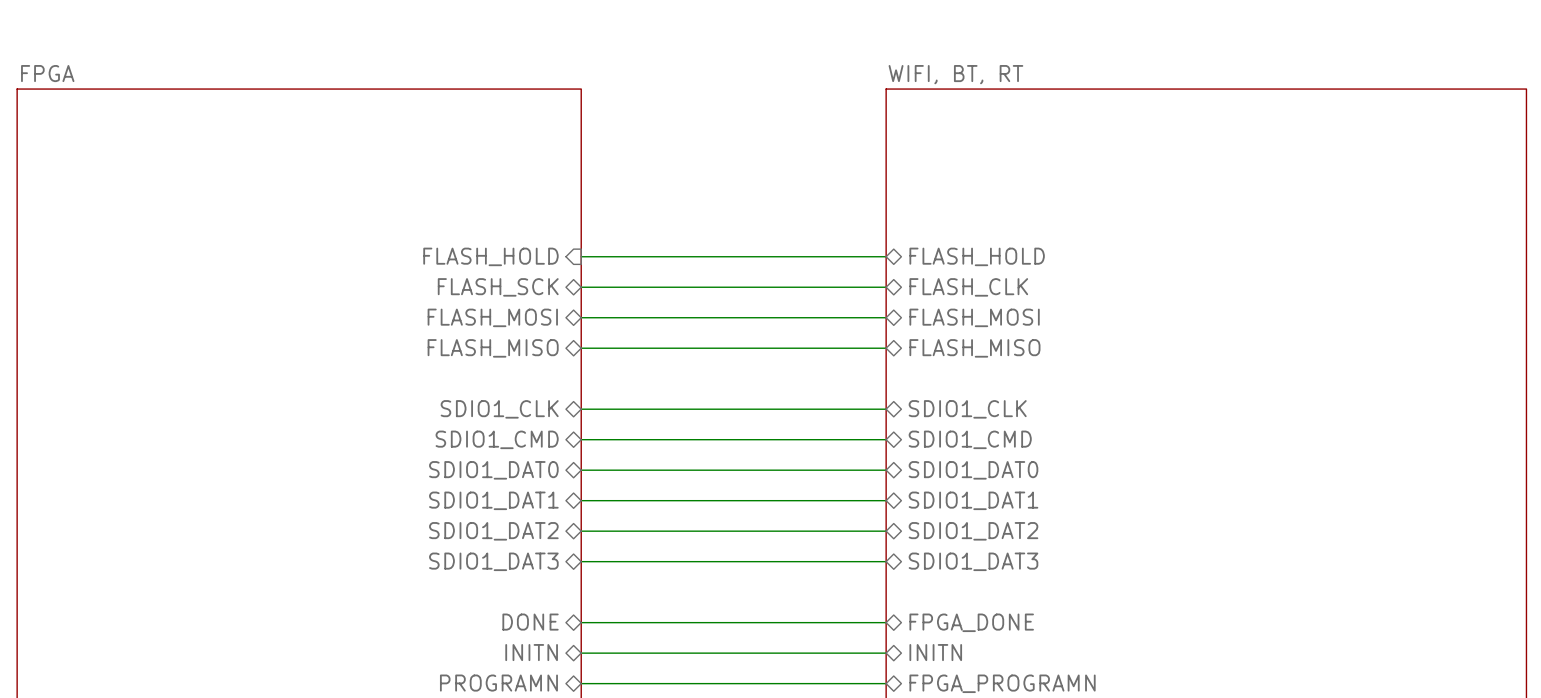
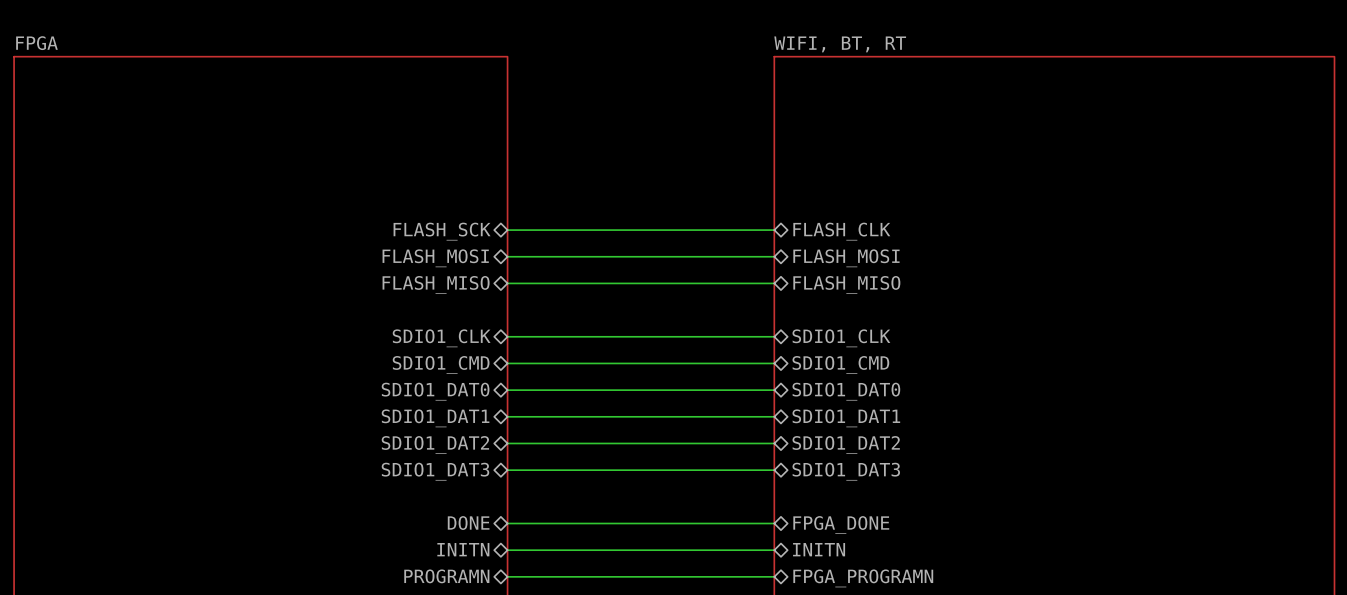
sheet pin: FLASH_HOLD (490, 256) -> none
wire: (581, 256) (886, 256) -> none
sheet pin: FLASH_HOLD (977, 256) -> none

